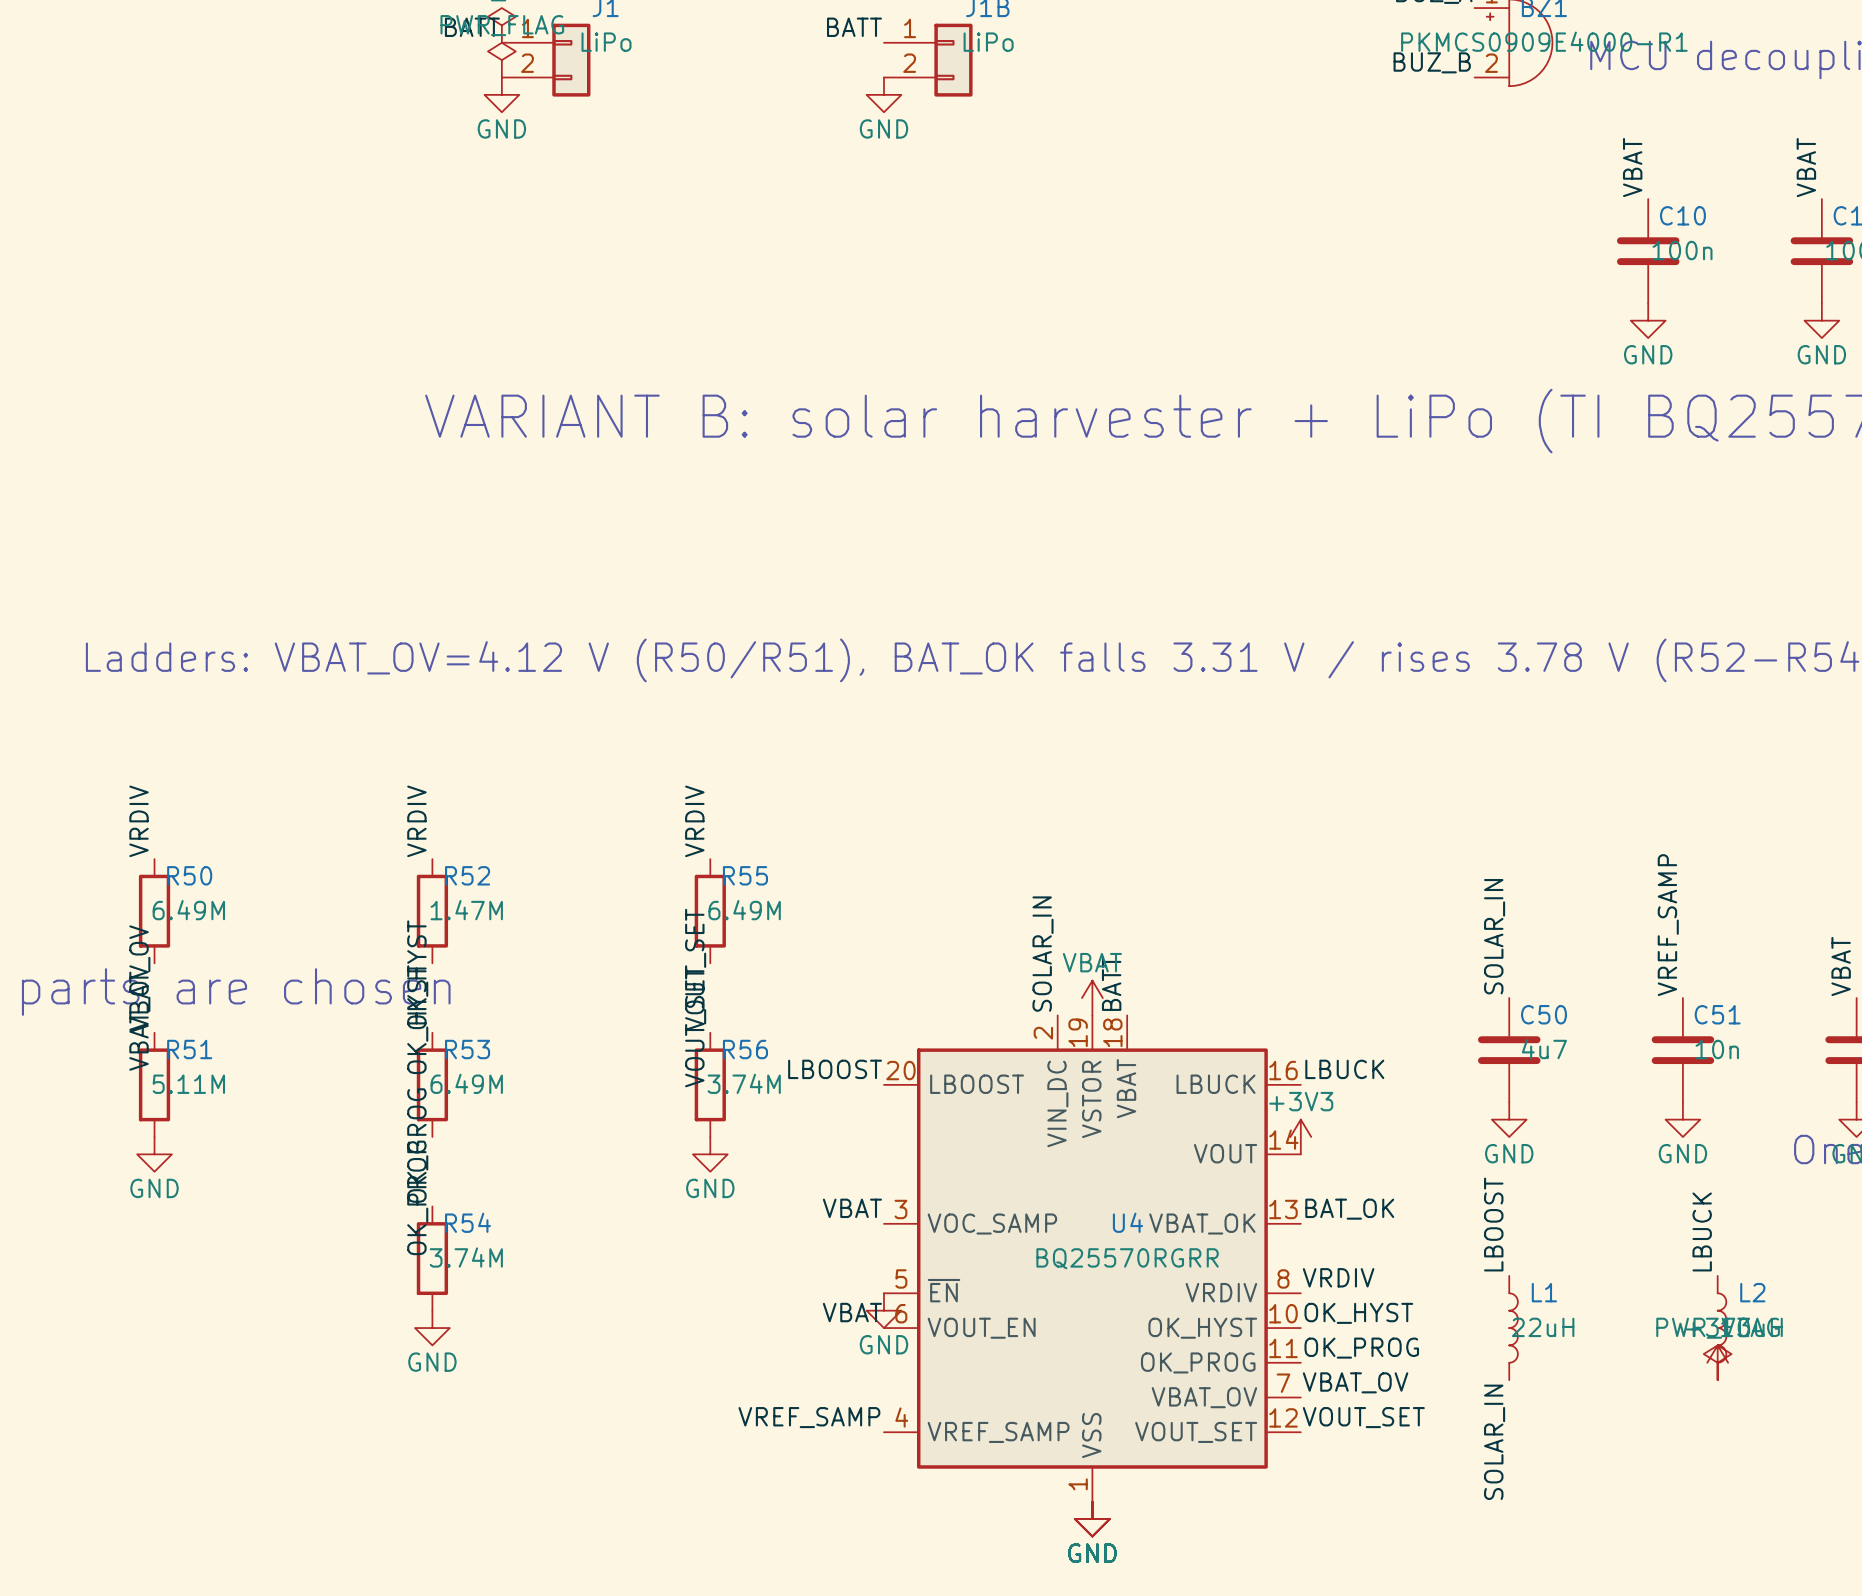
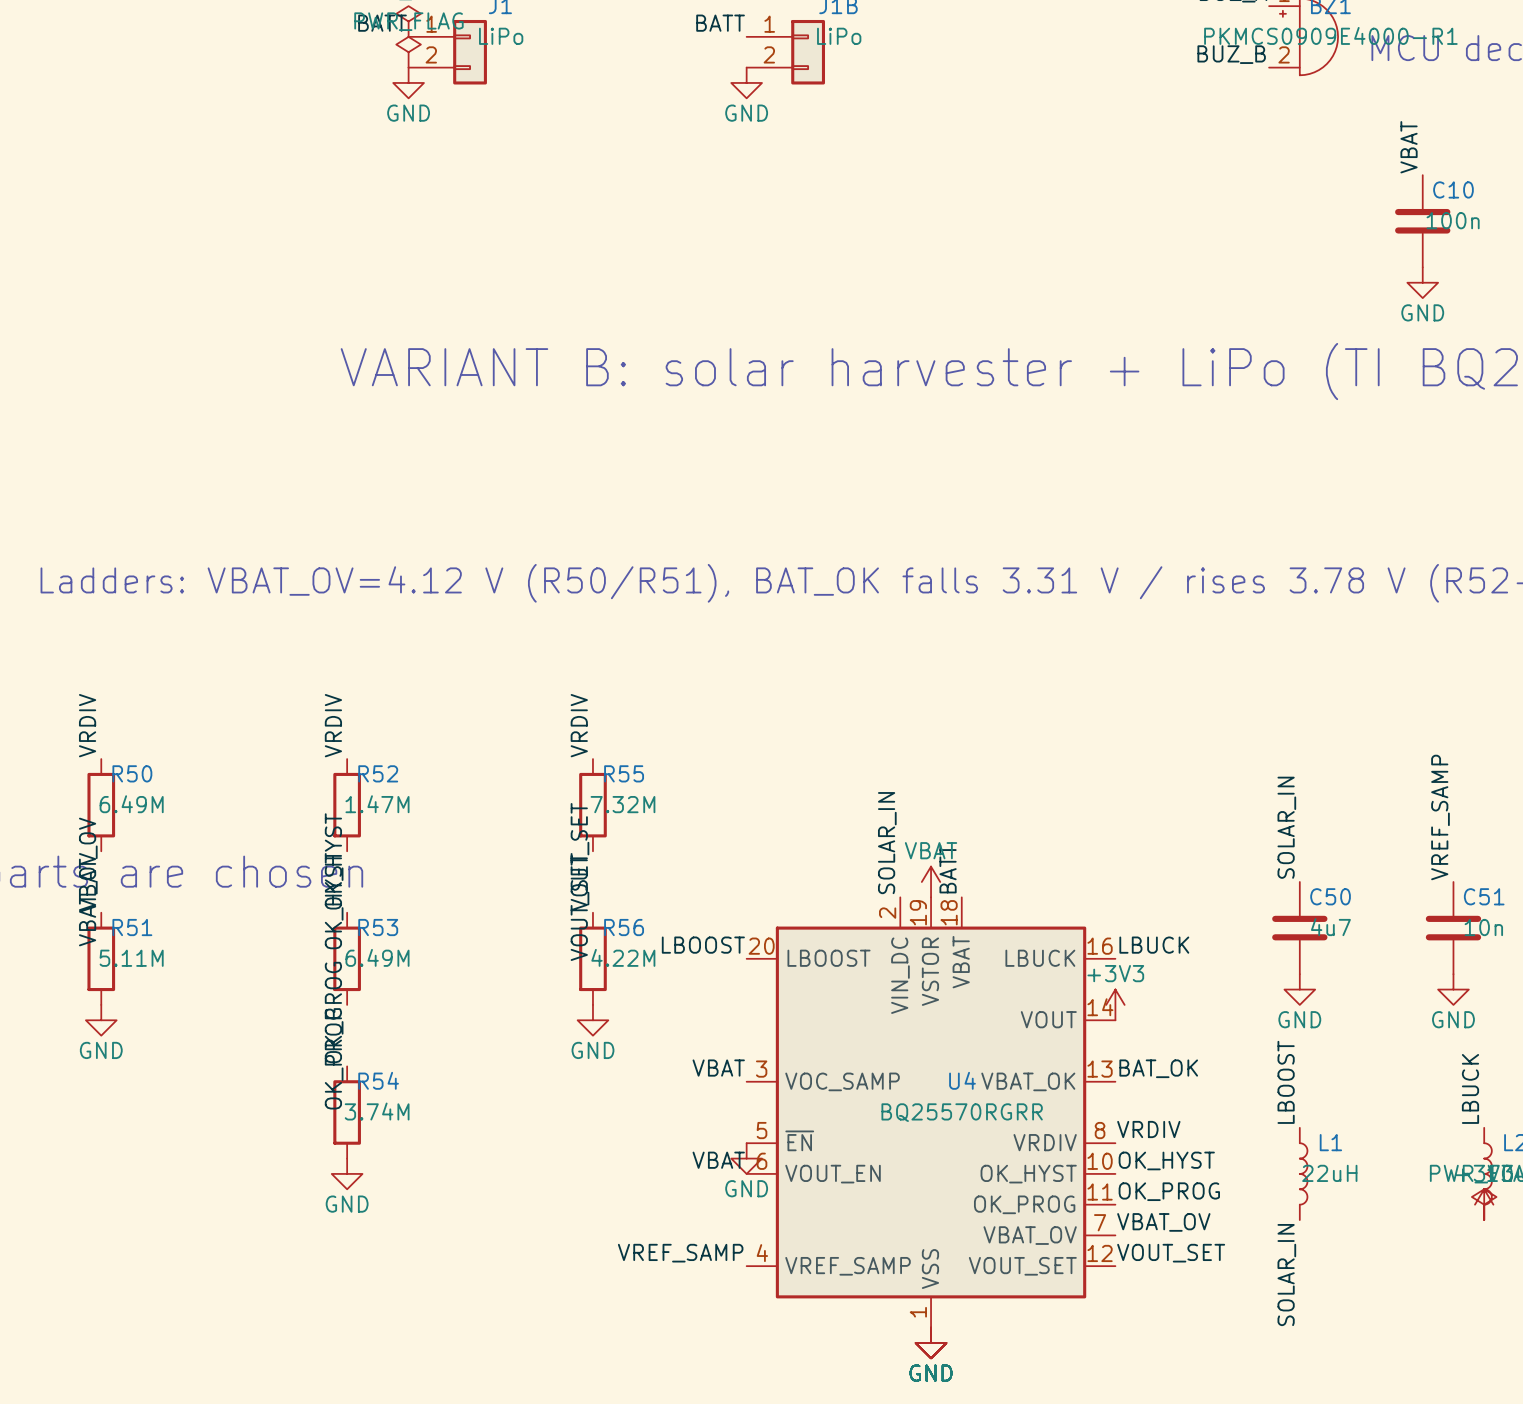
R55 value: 6.49M (744, 910) -> 7.32M (622, 804)
R56 value: 3.74M (744, 1083) -> 4.22M (623, 957)

